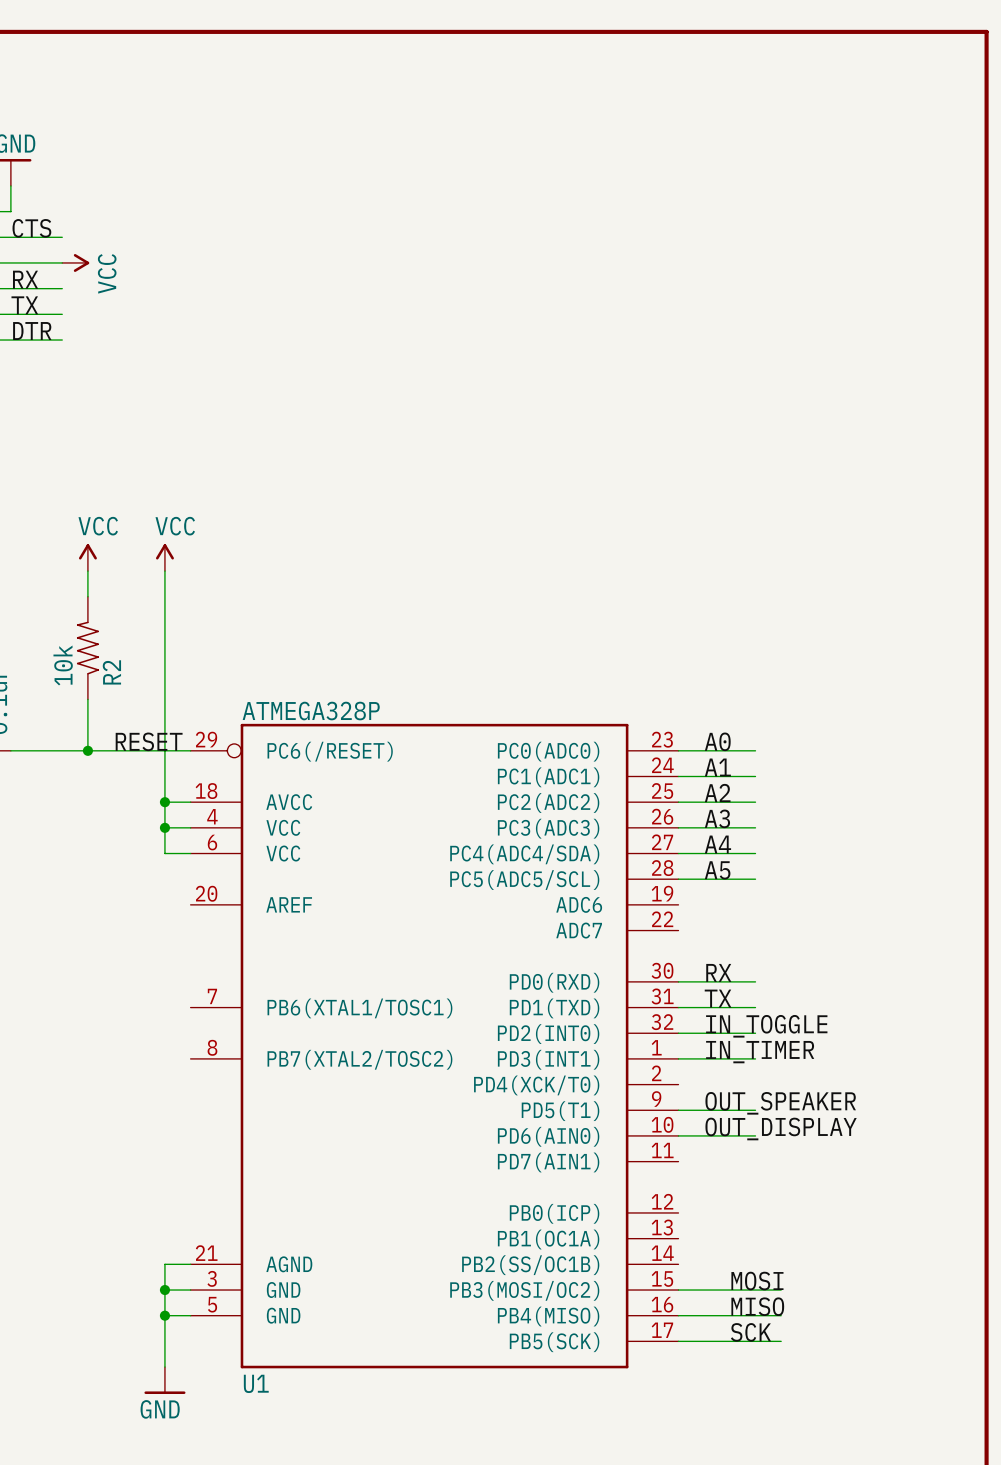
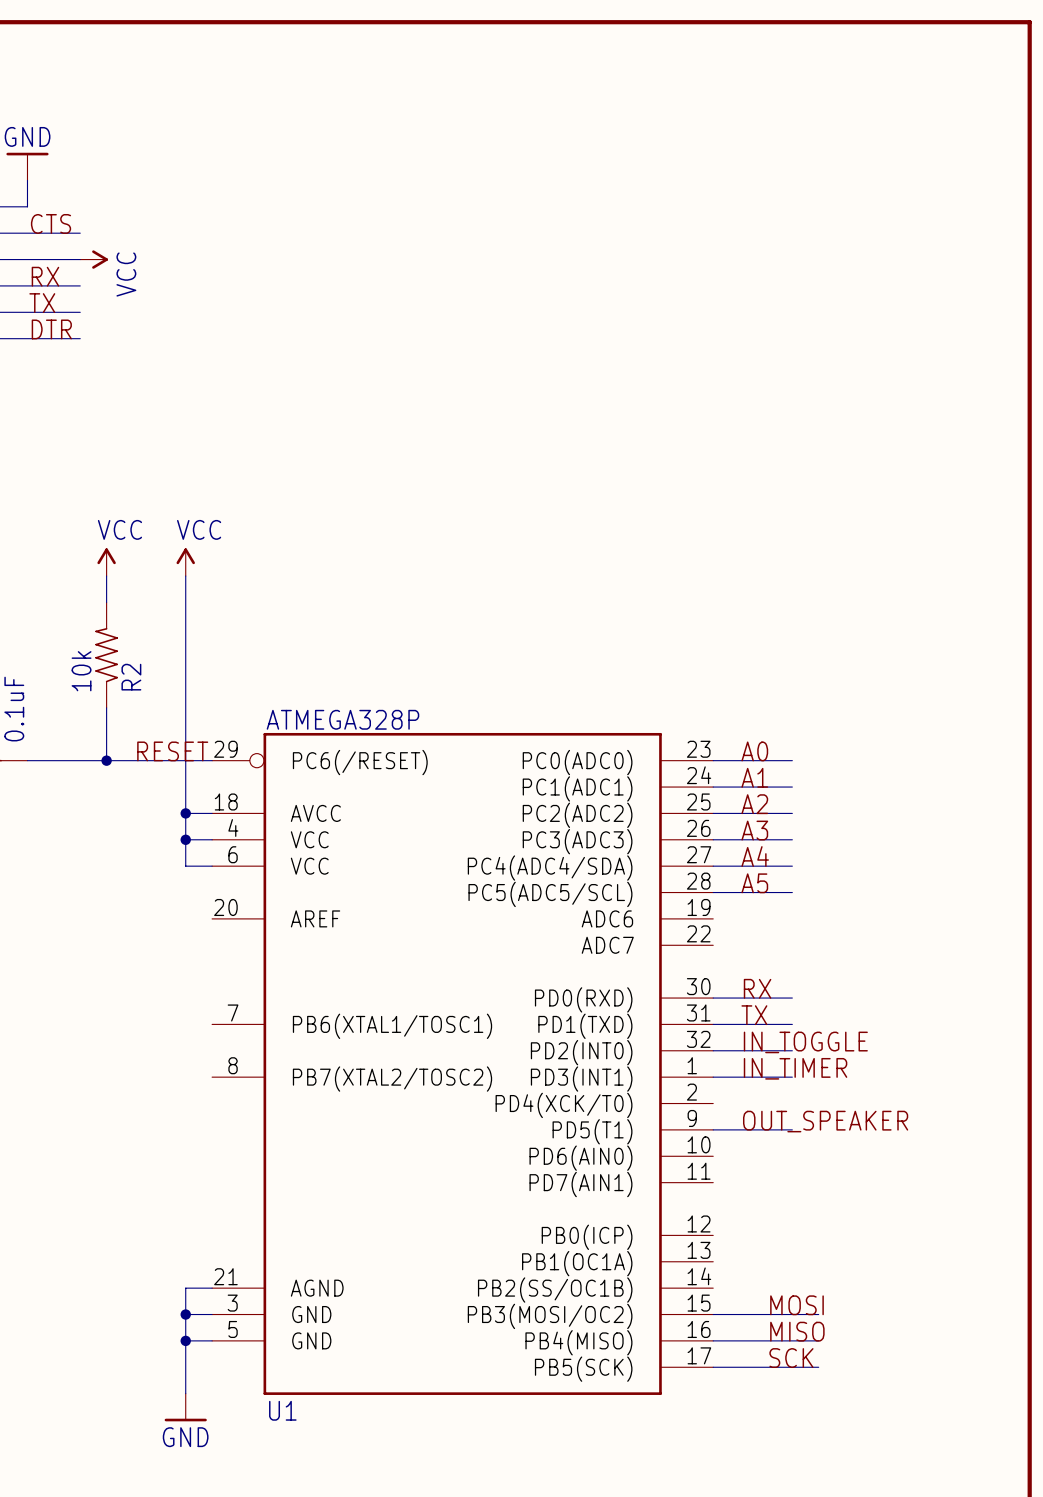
label: OUT_DISPLAY (781, 1128) -> none
wire: (678, 1135) (755, 1135) -> none

